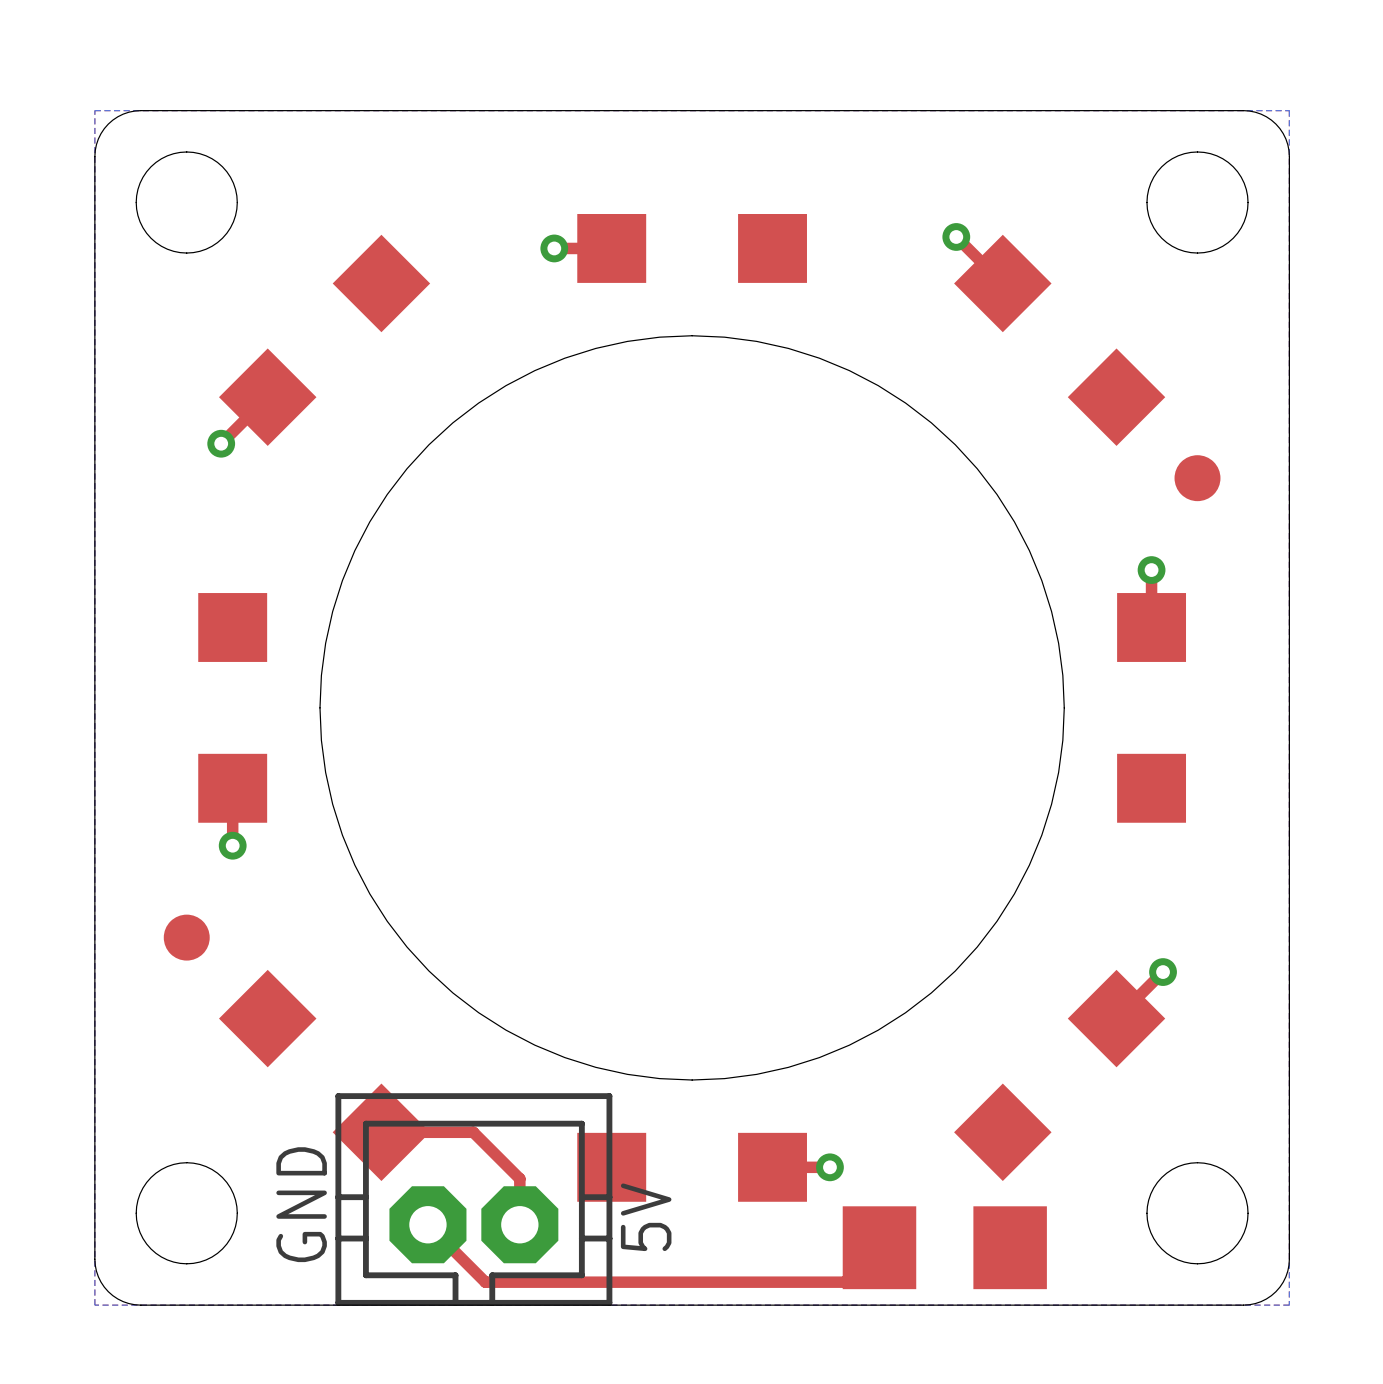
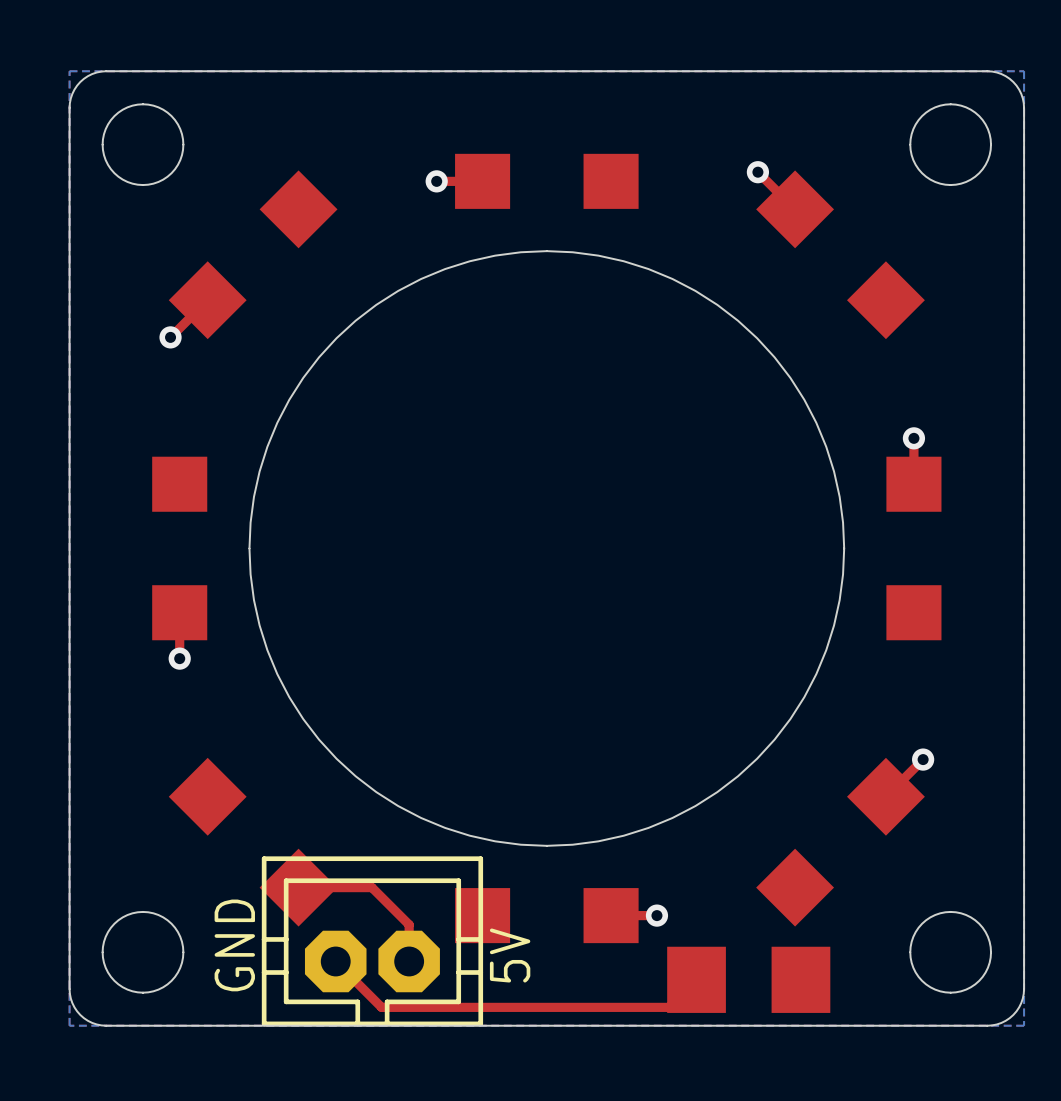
part: (1197, 478) -> none
part: (186, 937) -> none

